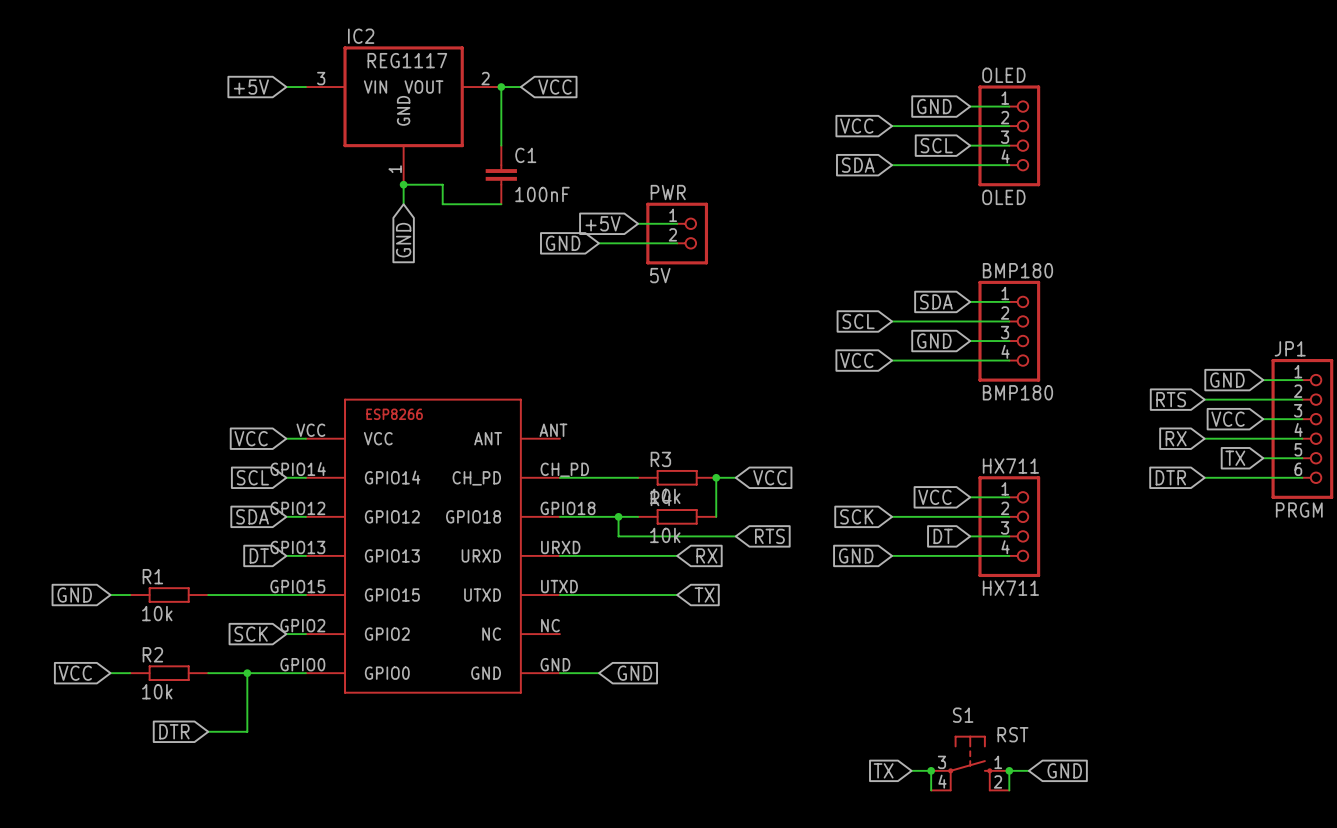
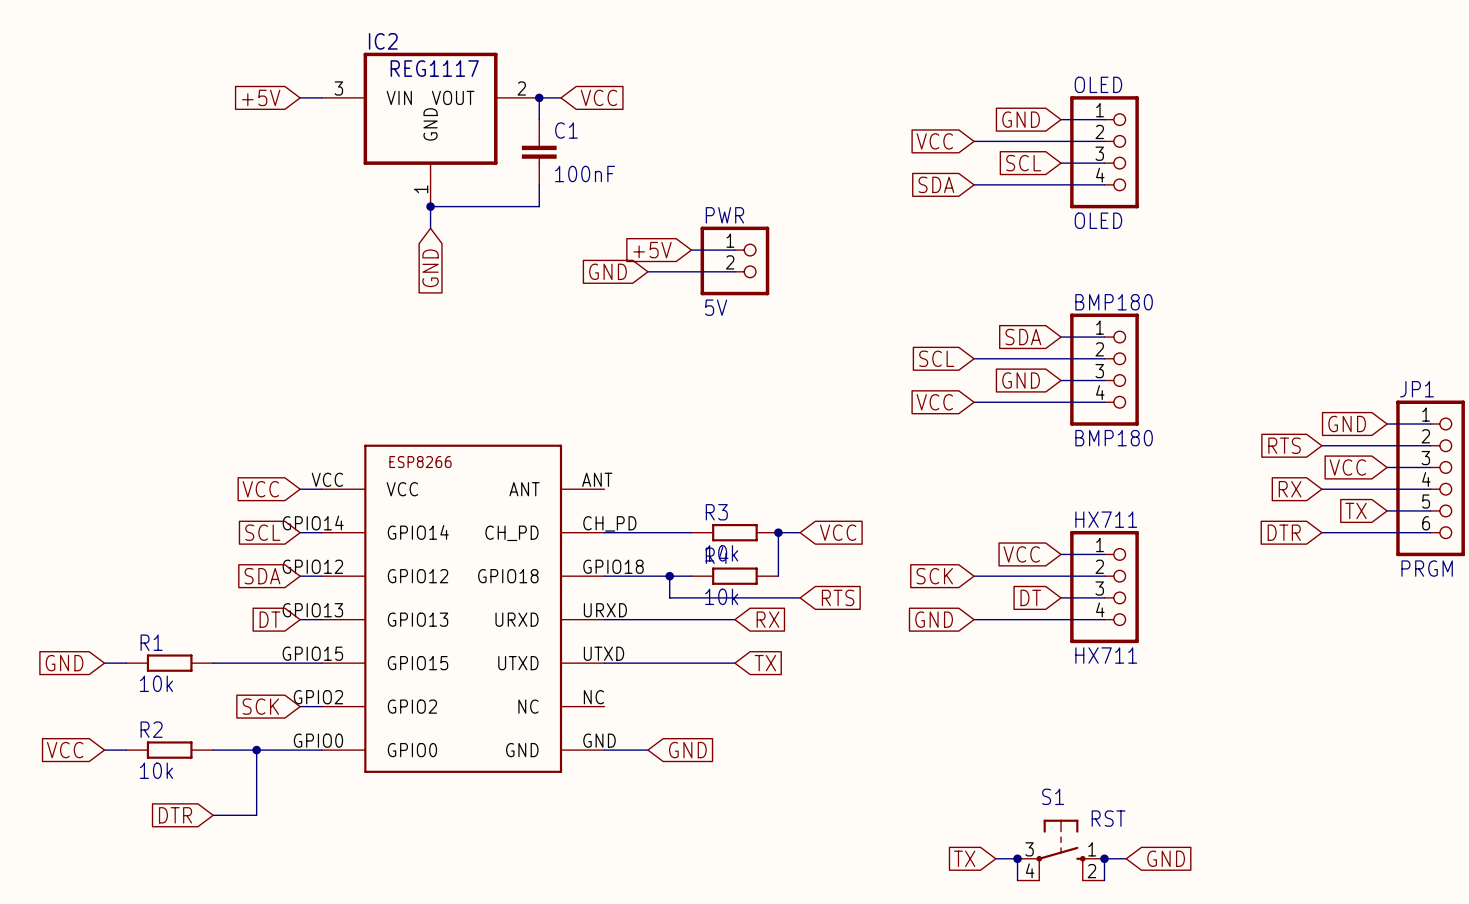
C1 position: (501, 174) -> (539, 152)
wire: (442, 184) (442, 204) (501, 204) -> (474, 206) (539, 206) (539, 184)

